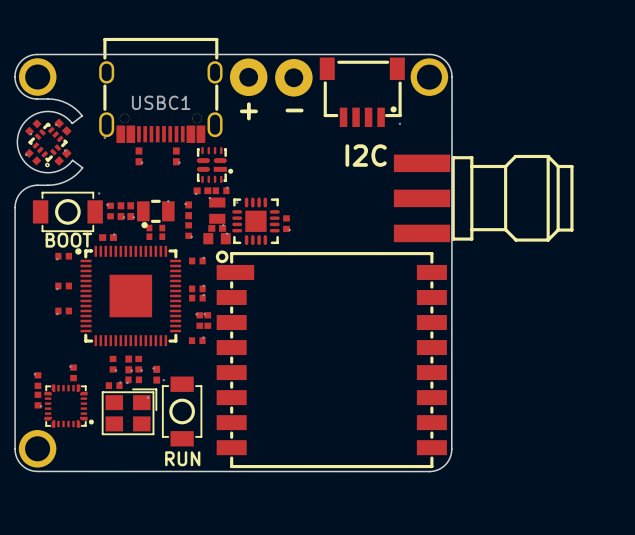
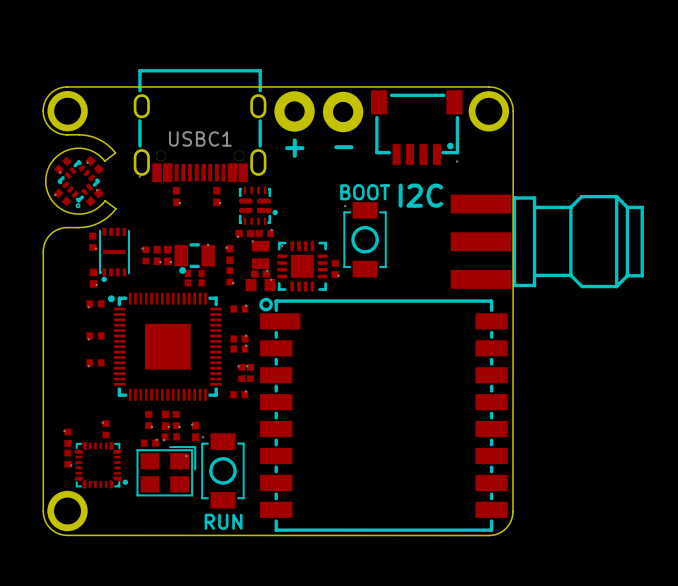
part: none -> (93, 241)
part: none -> (114, 254)
part rotation: 0° (67, 211) -> 90° counterclockwise (365, 239)
part position: (67, 211) -> (365, 239)
part rotation: 0° (108, 237) -> 90° clockwise (93, 278)
part position: (108, 237) -> (93, 278)
text position: BOOT (68, 240) -> BOOT (365, 192)

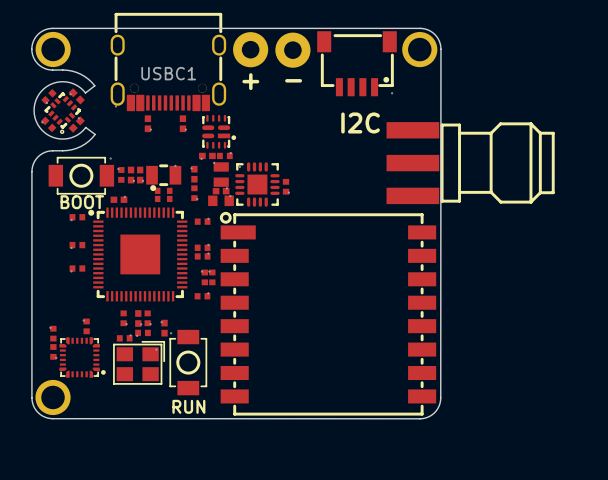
text position: BOOT (365, 192) -> BOOT (82, 202)
part rotation: 0° (365, 239) -> 90° clockwise (81, 175)
part position: (365, 239) -> (81, 175)
part: (93, 241) -> none
part: (114, 254) -> none
part rotation: 0° (93, 278) -> 90° counterclockwise (118, 199)
part position: (93, 278) -> (118, 199)

